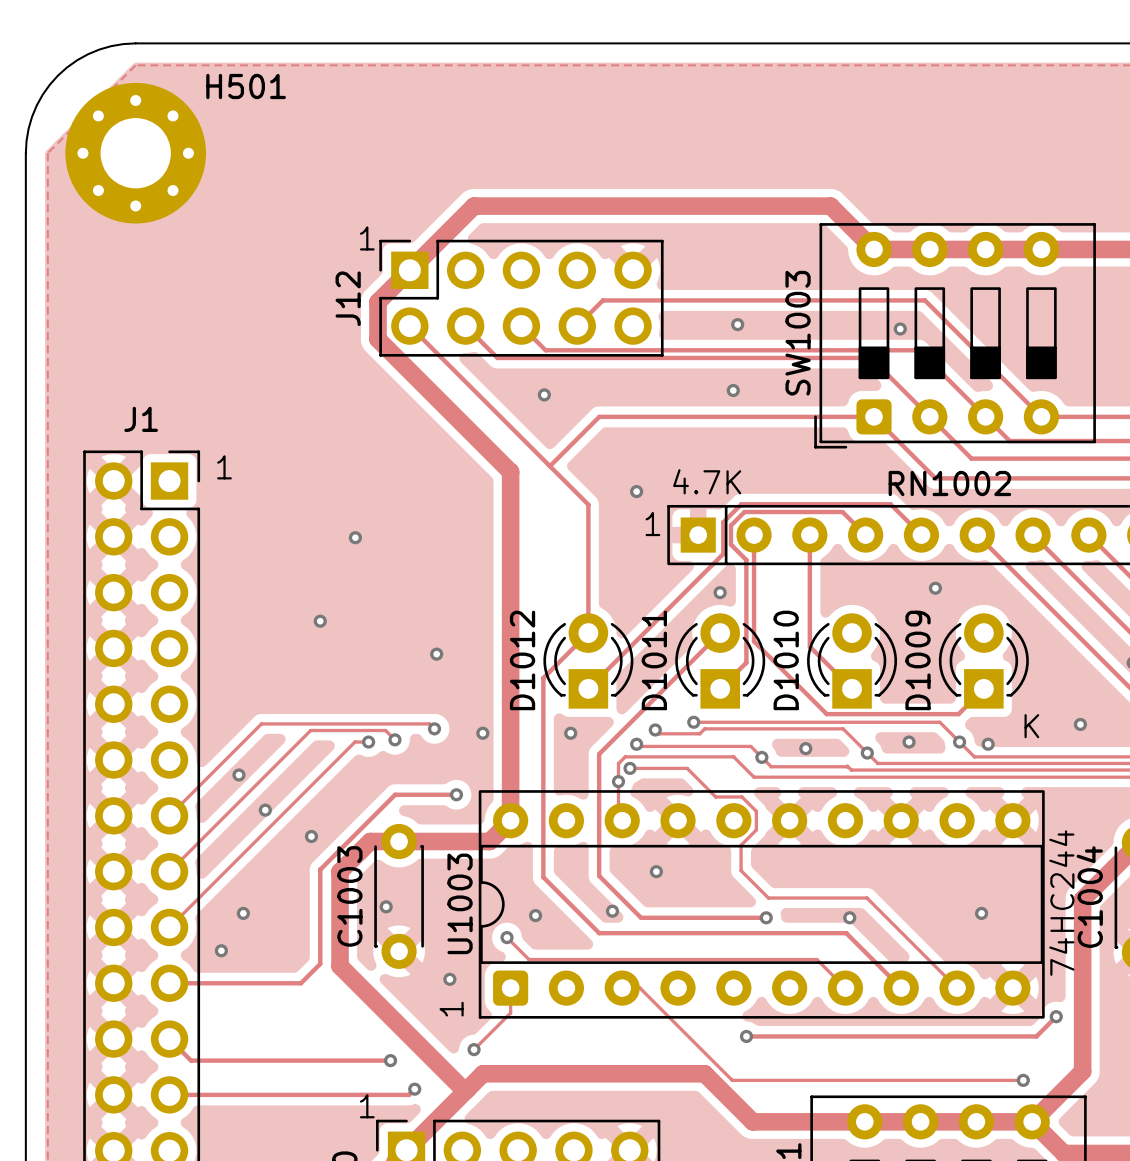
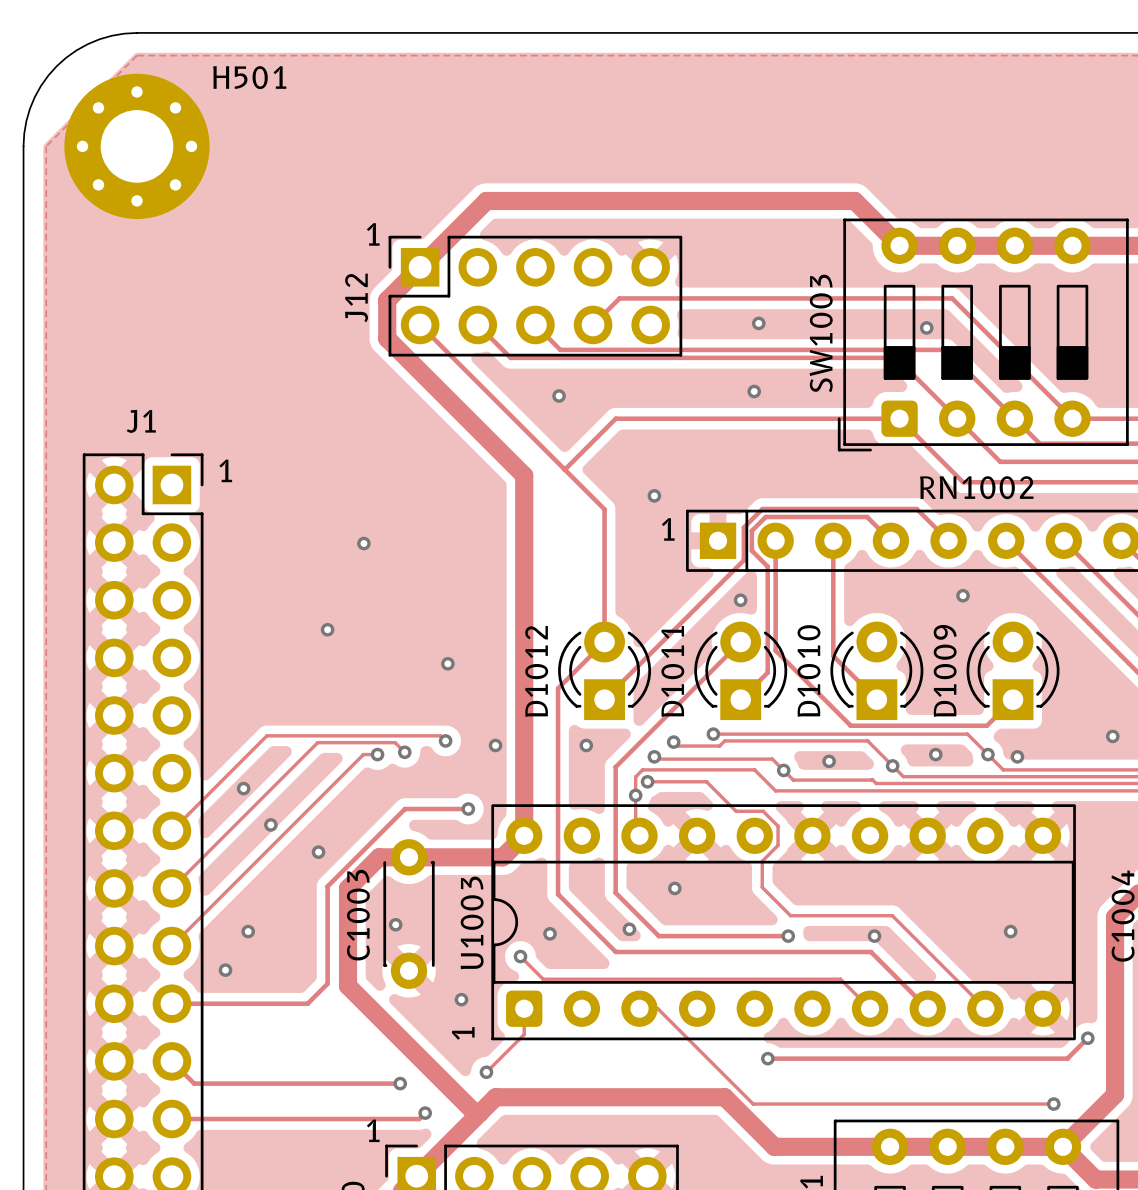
text: 4.7K (707, 481) -> none
text: K (1031, 726) -> none
text: 74HC244 (1061, 903) -> none

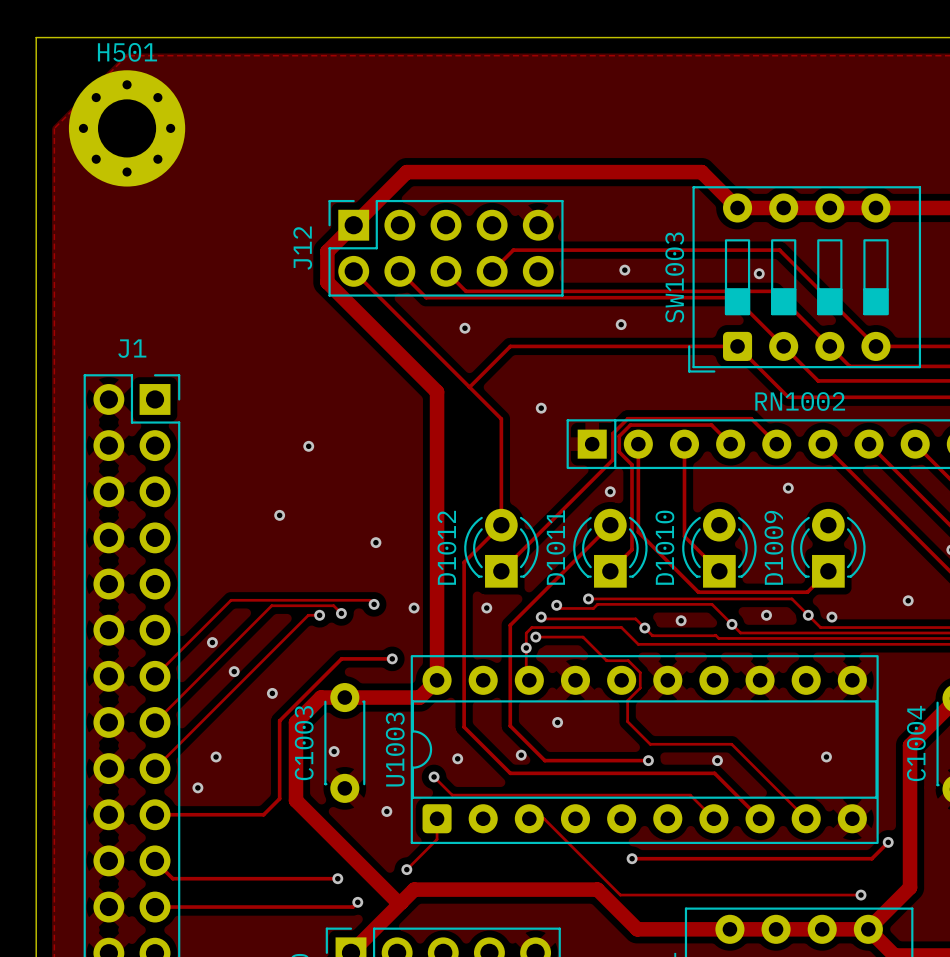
board edge: (136, 32) (99, 39) (76, 50) (56, 66) (34, 97) (26, 121) (23, 146) -> (127, 37) (36, 37) (36, 128)
H501 name position: H501 (249, 77) -> H501 (127, 52)
text: 1 (373, 234) -> none
text: 1 (225, 470) -> none
text: 1 (668, 529) -> none
text: 1 (463, 1033) -> none
text: 1 (373, 1130) -> none

